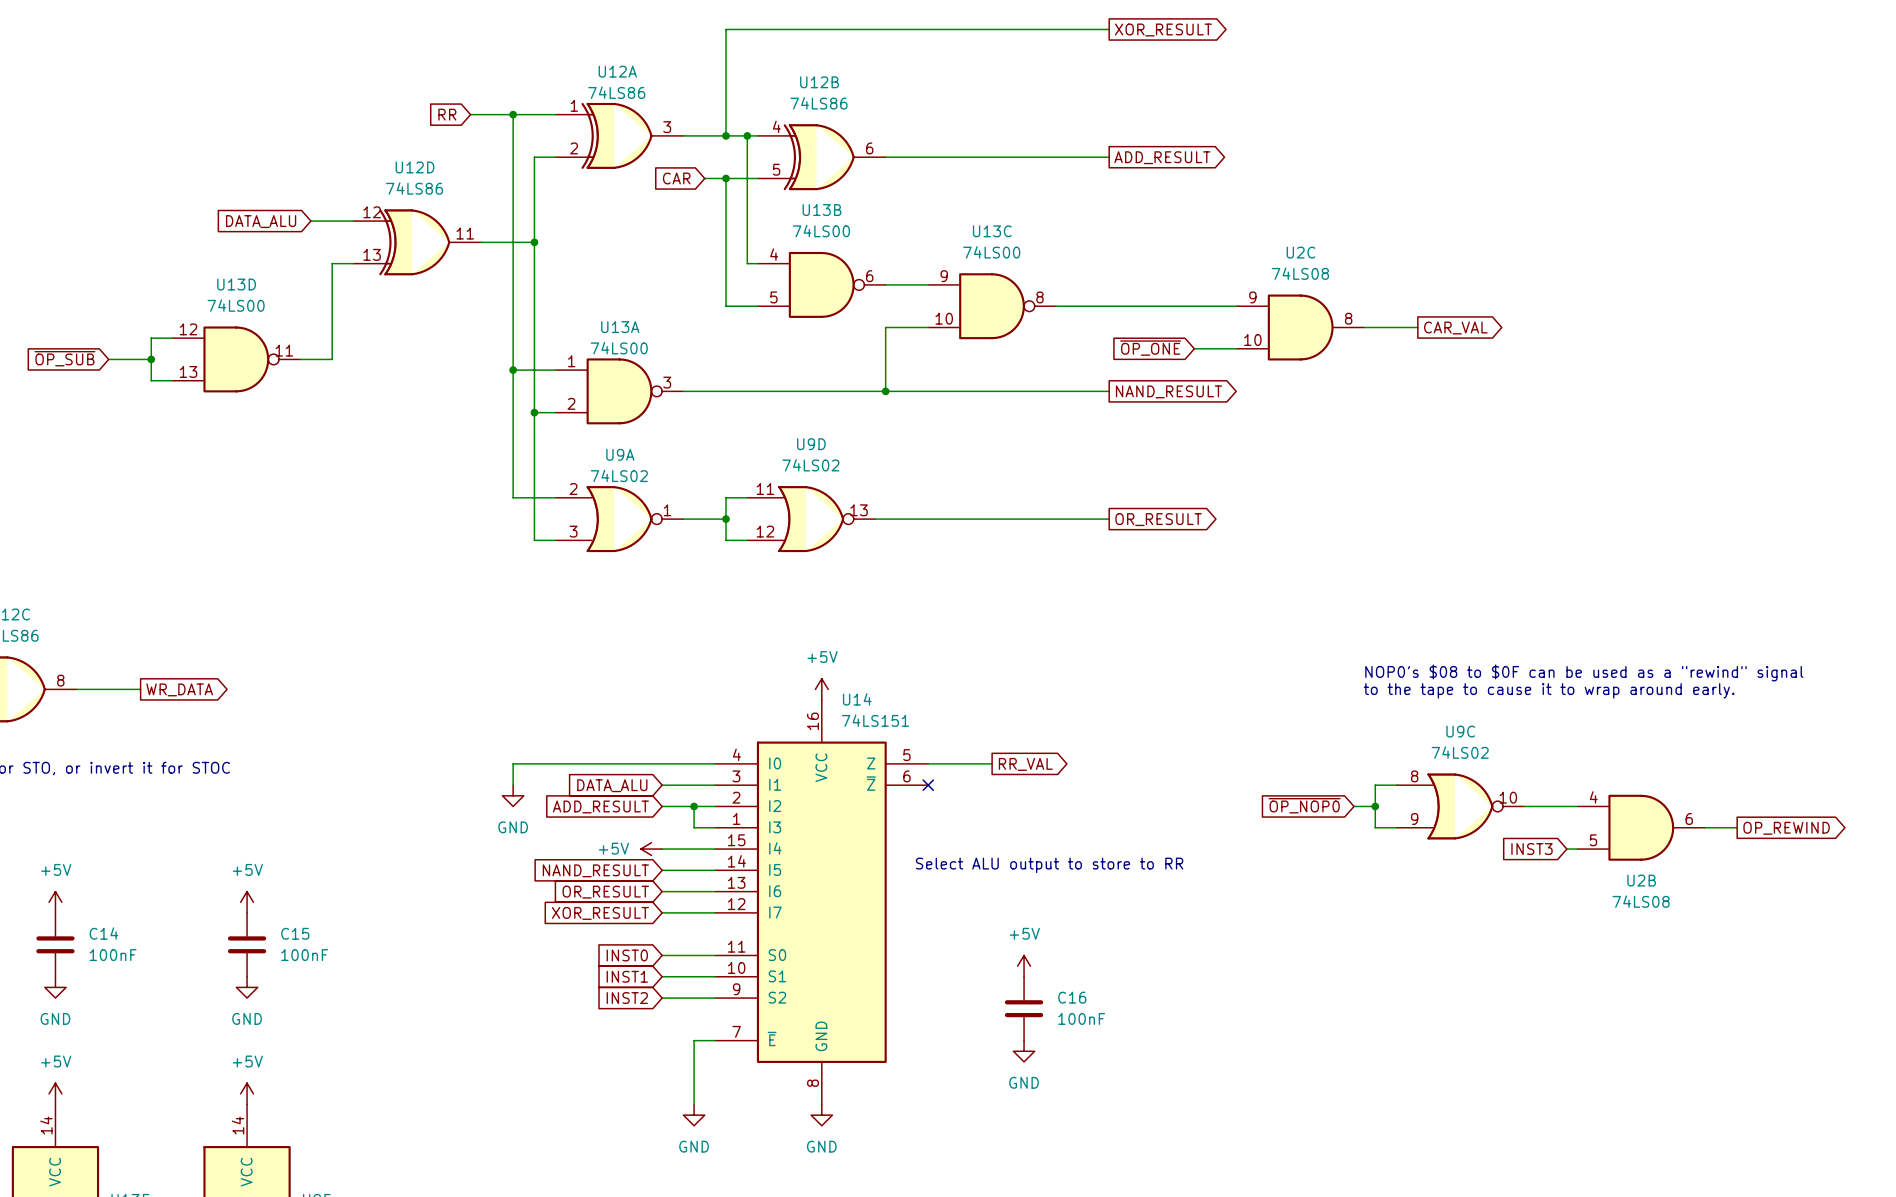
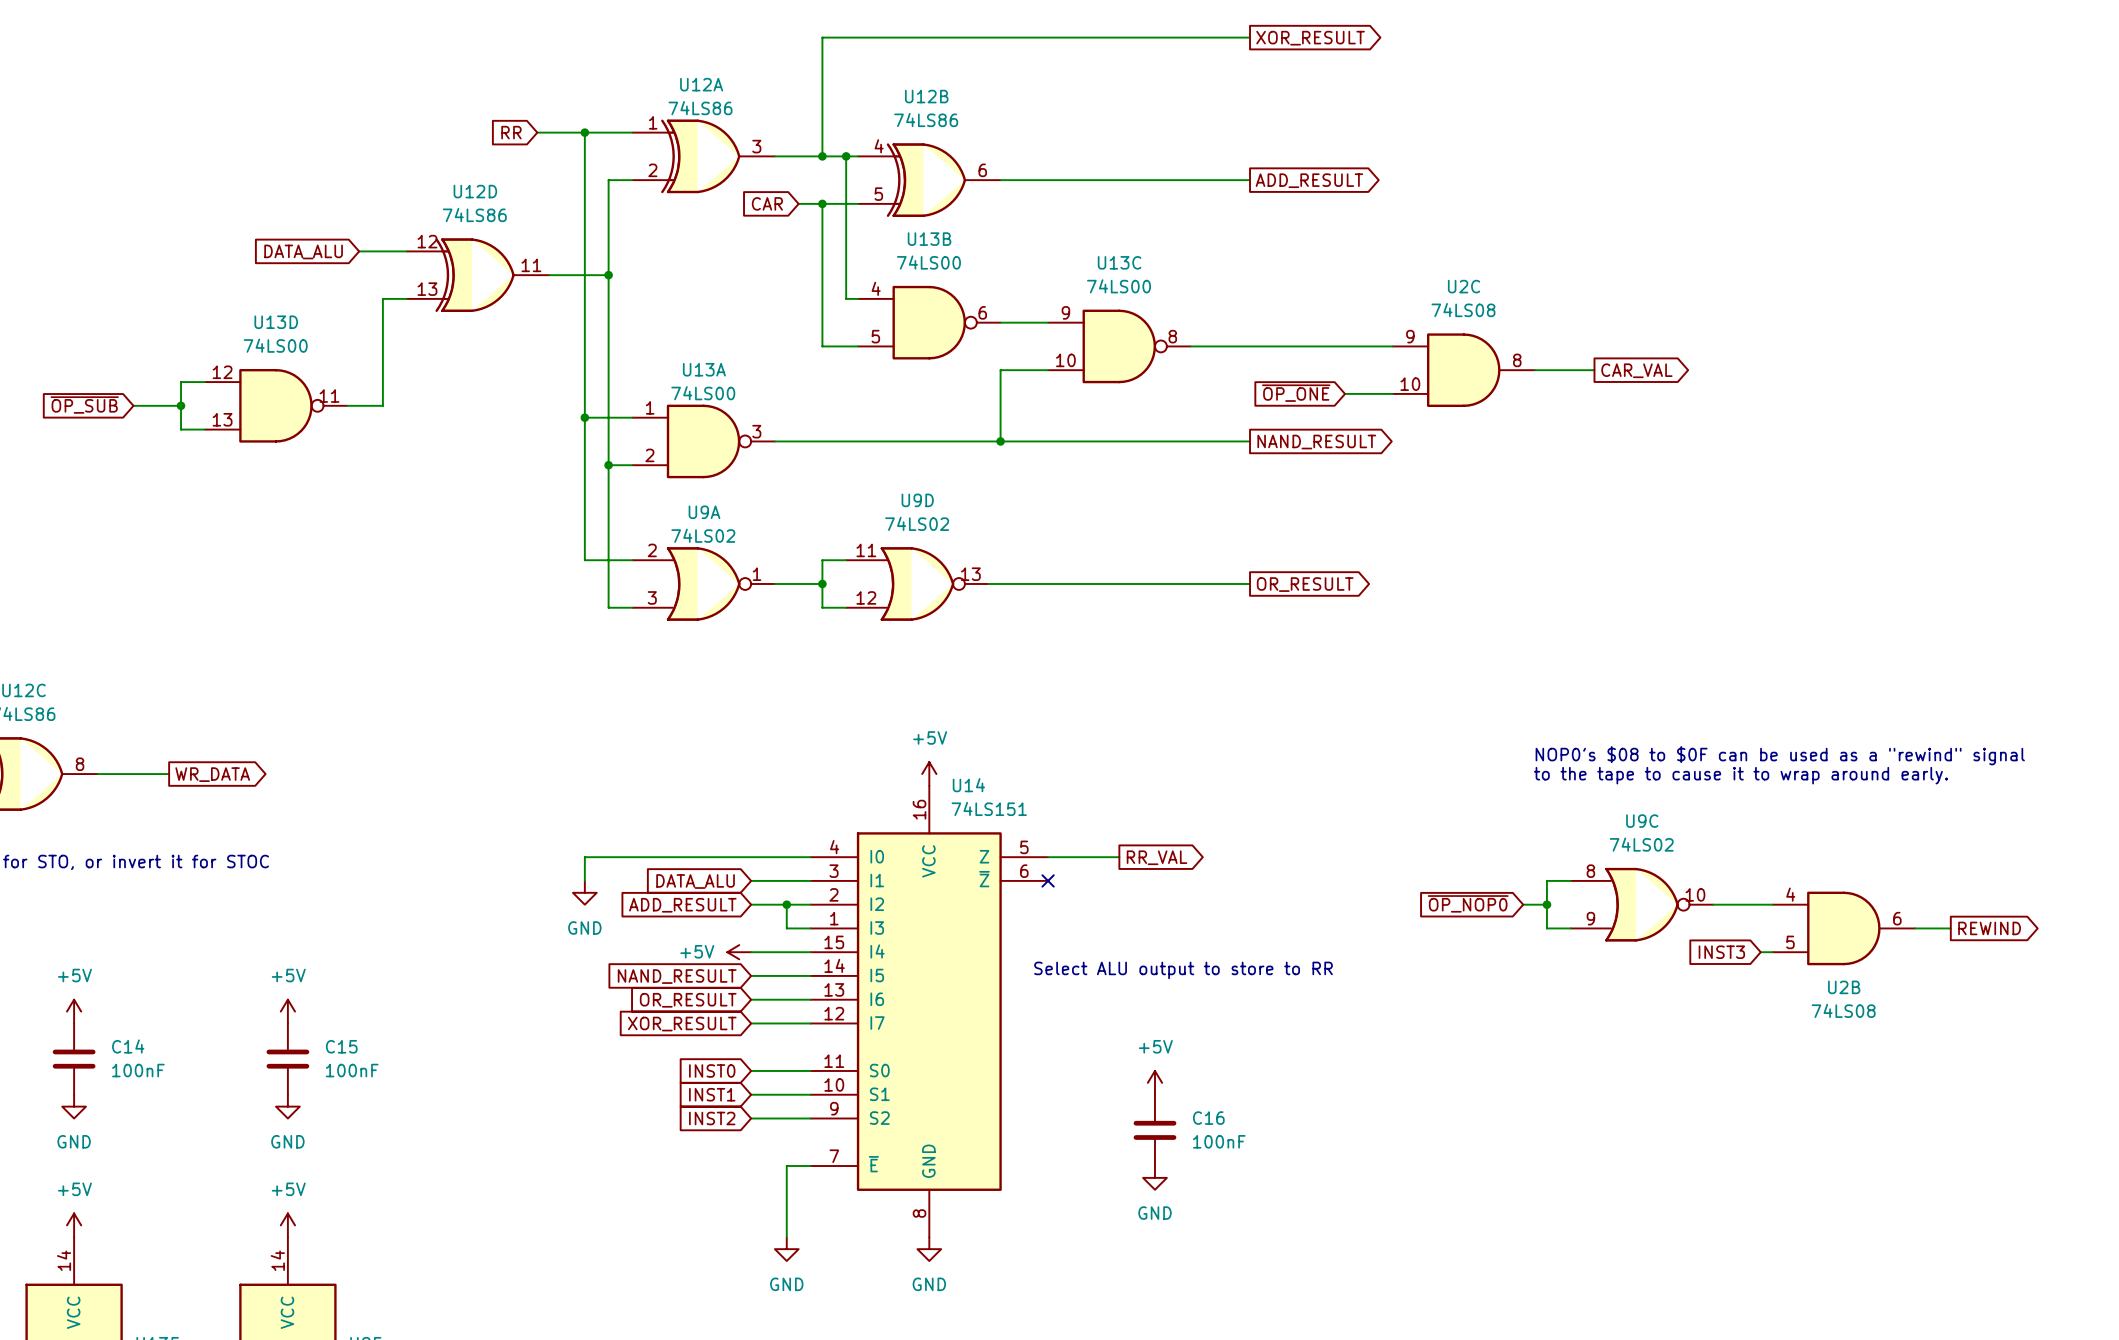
global label: OP_REWIND (1786, 828) -> REWIND (1989, 928)

